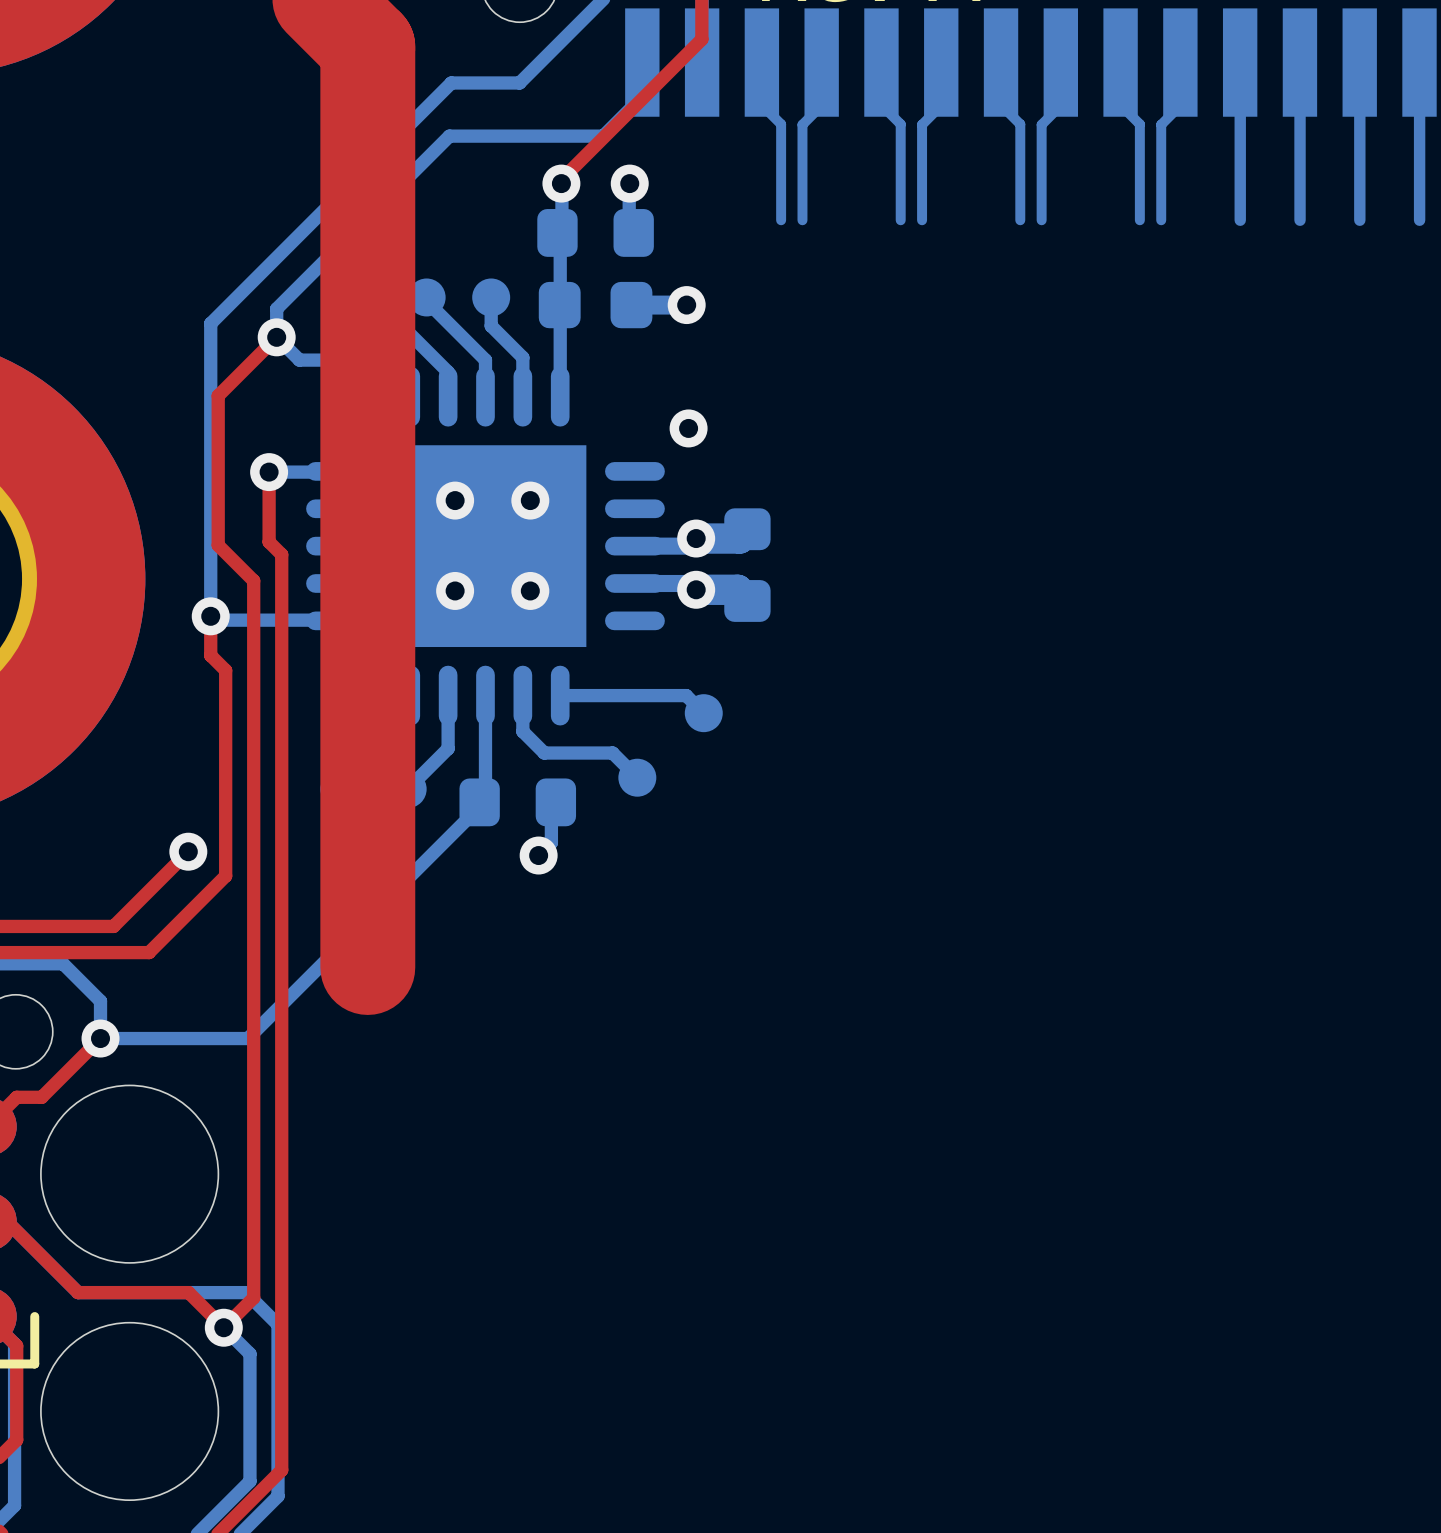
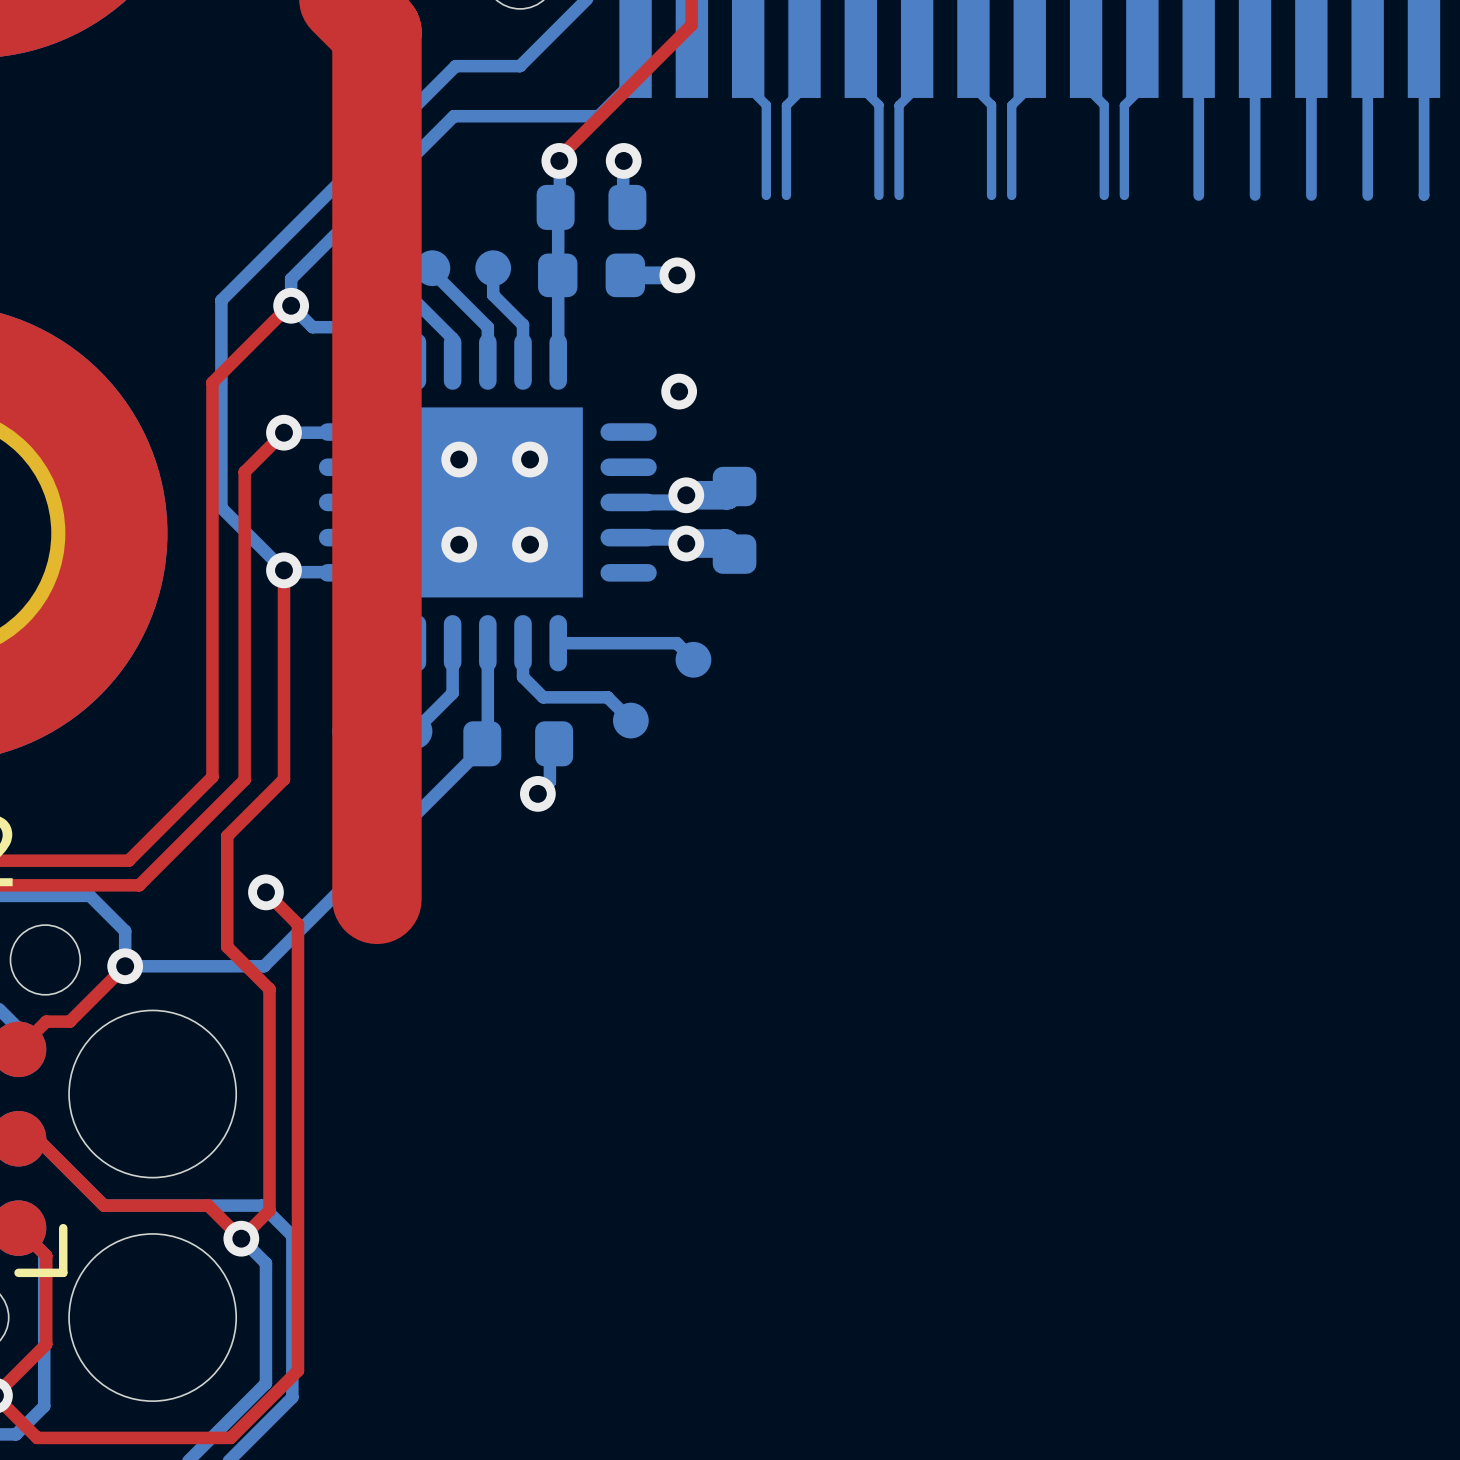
bottom track: (210, 323) (210, 616) (214, 620) (267, 620) -> (229, 292) (221, 300) (221, 507) (283, 570)
top track: (276, 337) (218, 395) (218, 545) (253, 580) (253, 1062) -> (276, 577) (283, 570) (283, 779) (227, 836) (227, 946) (269, 989)
top track: (269, 472) (269, 542) (281, 554) (281, 1470) -> (265, 892) (297, 924) (297, 1370) (295, 1372)
top track: (210, 616) (210, 655) (225, 670) (225, 876) (149, 952) (115, 952) -> (283, 432) (244, 472) (244, 779) (139, 885)
via position: (210, 616) -> (283, 570)
top track: (188, 851) (113, 926) (104, 926) -> (277, 317) (212, 382) (212, 776) (128, 860)
via: (188, 851) -> none
via: none -> (265, 892)

